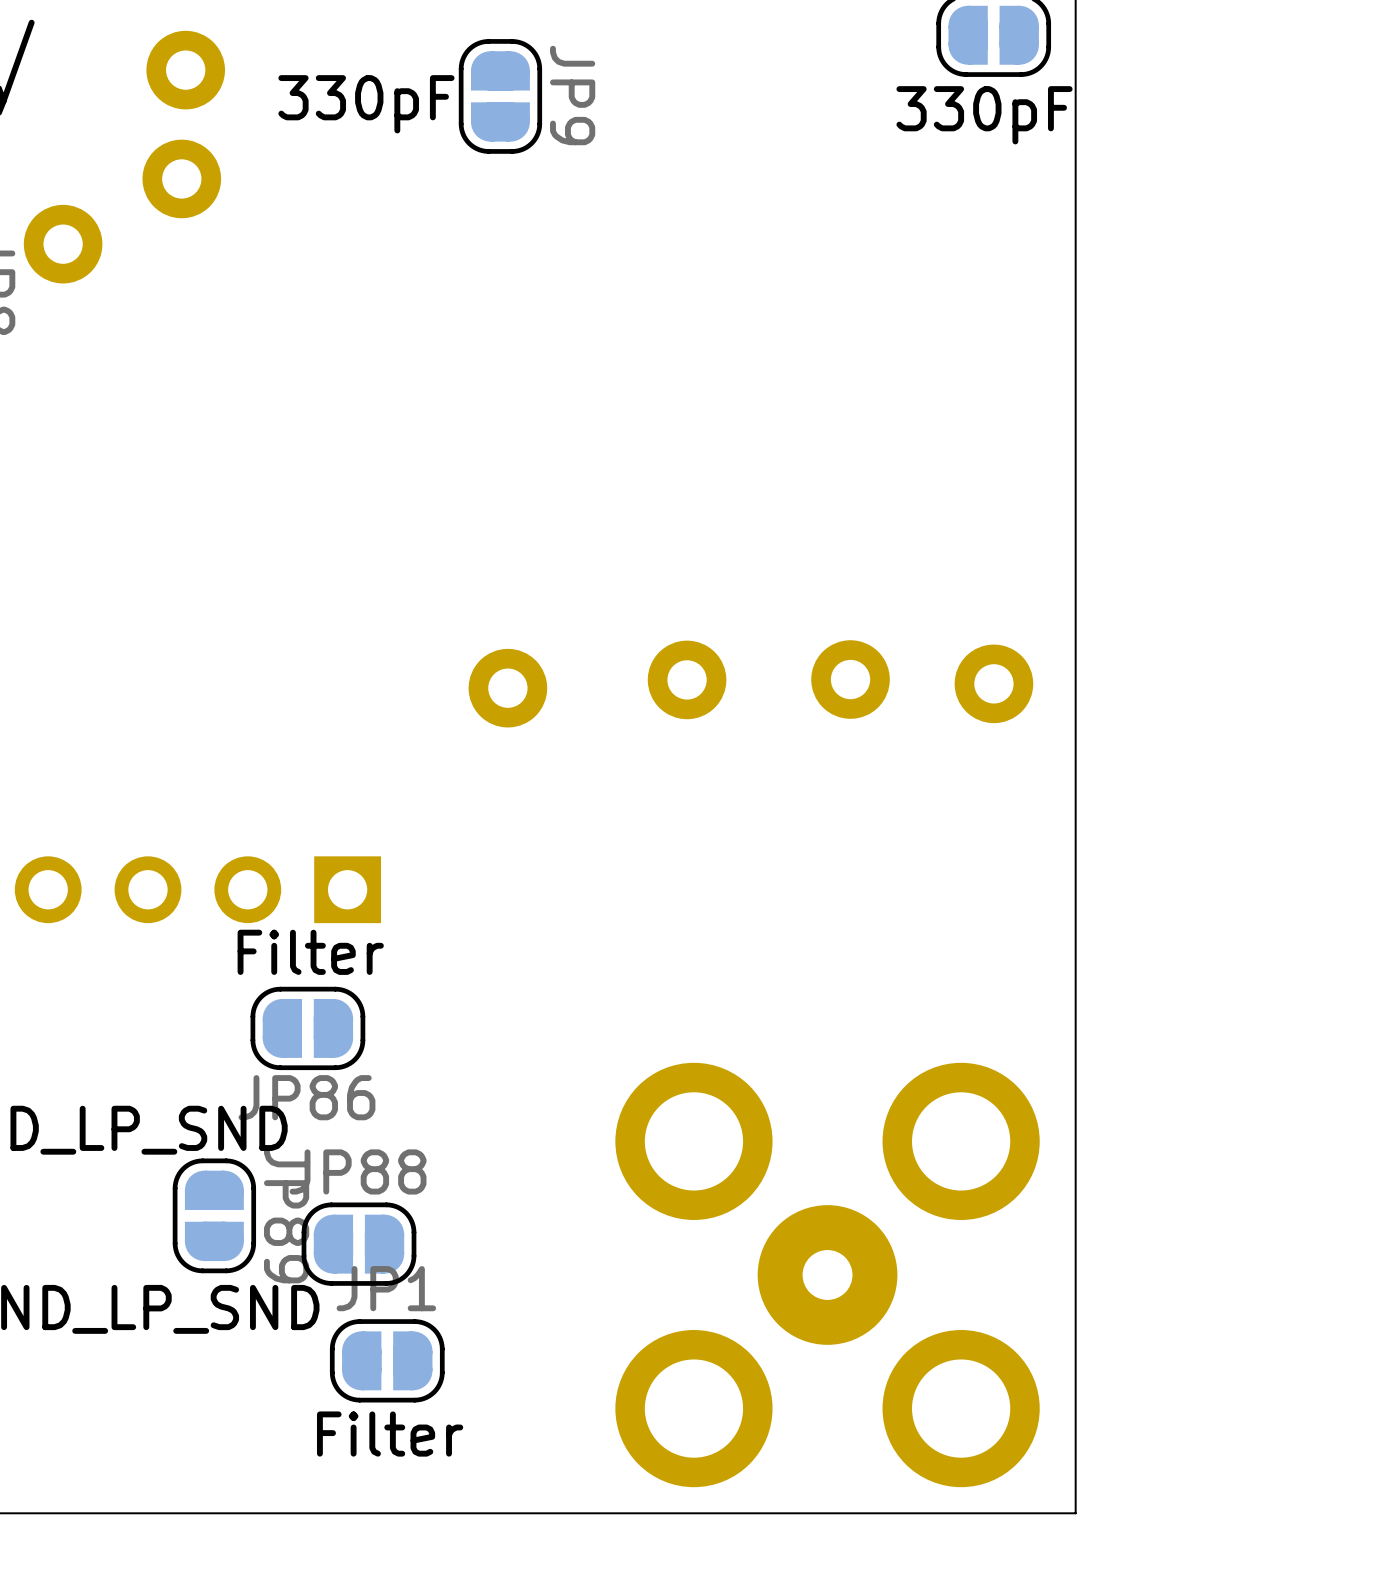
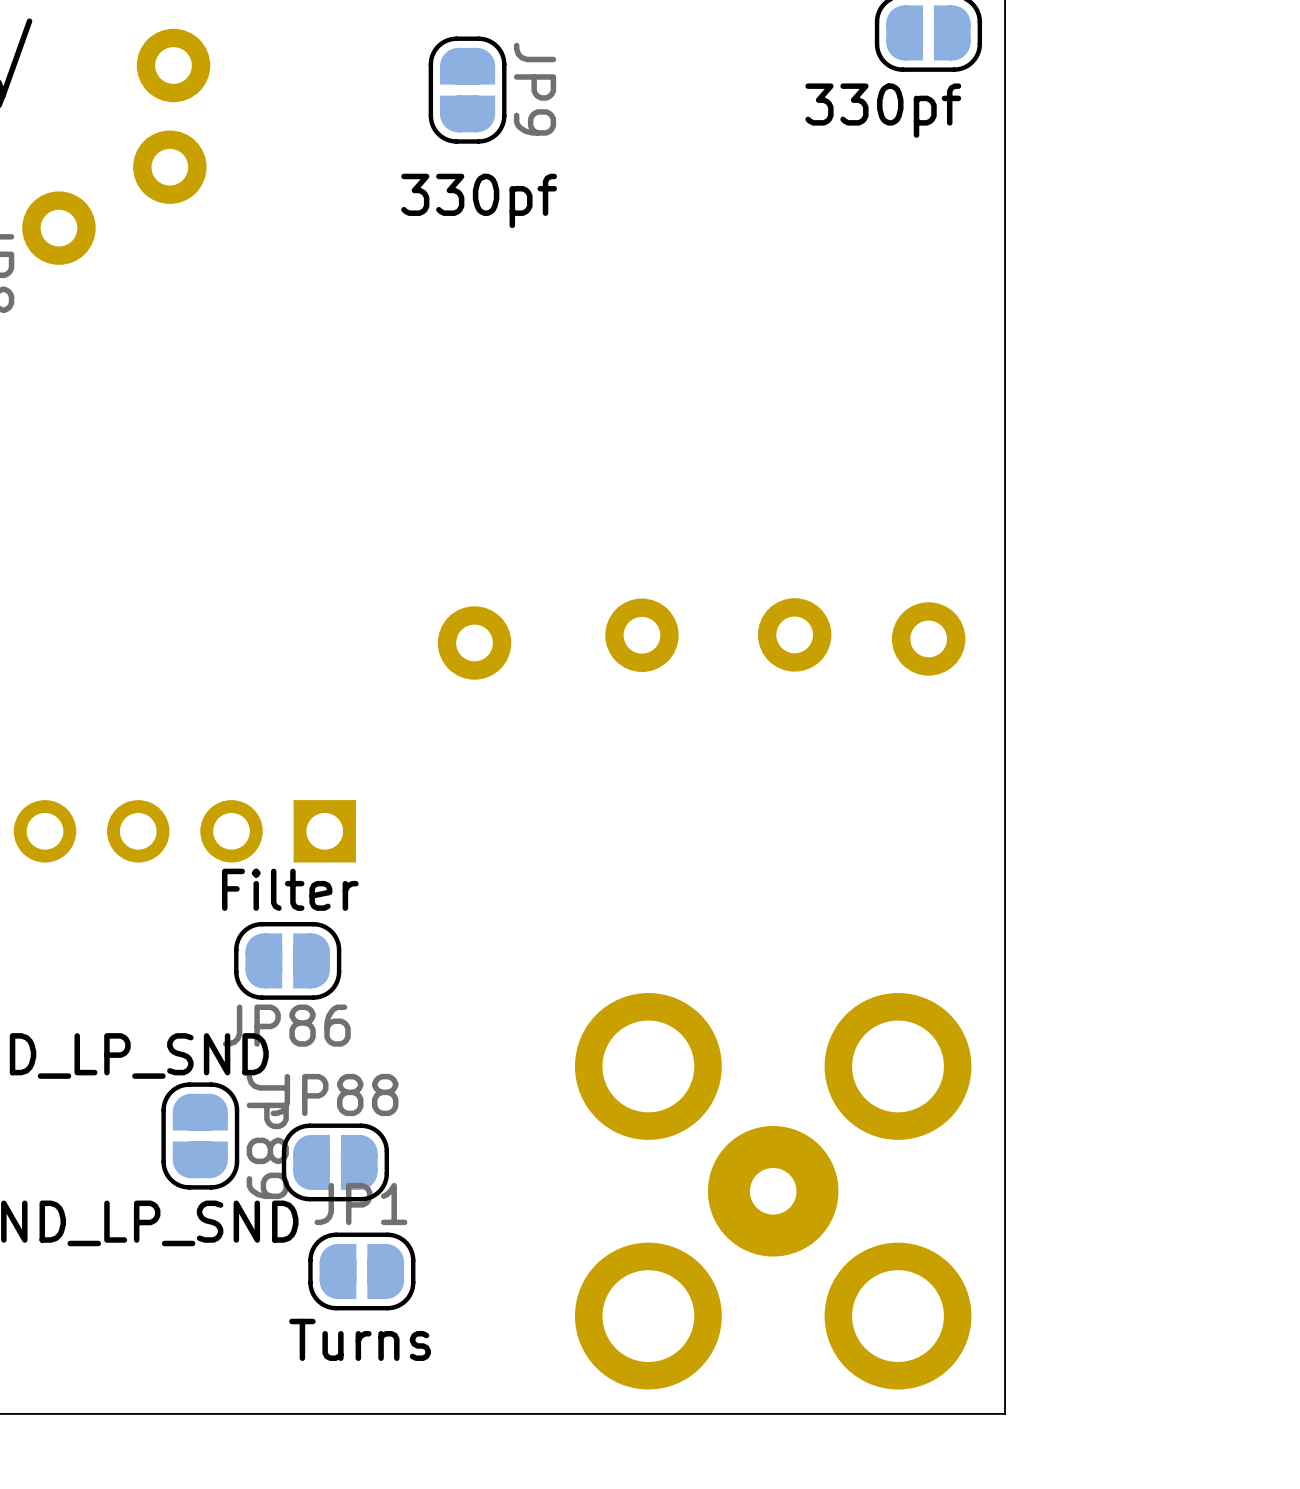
JP9 value: 330pF (366, 104) -> 330pf (479, 200)
part value: 330pF (984, 115) -> 330pf (883, 110)
JP1 value: Filter (390, 1434) -> Turns (360, 1339)

